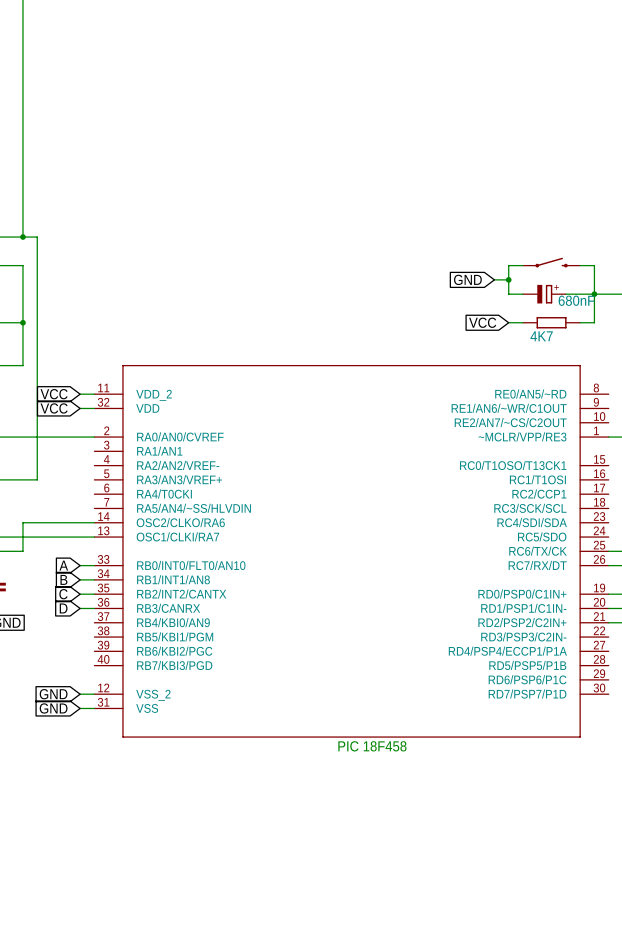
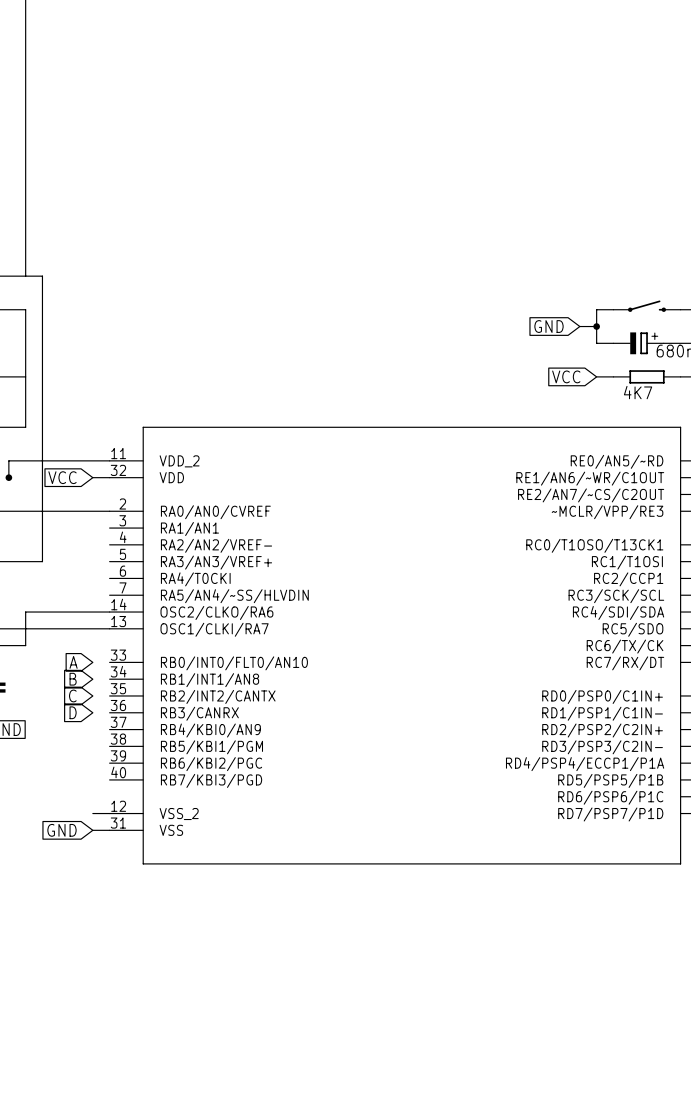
junction: (22, 237) -> none
junction: (22, 322) -> none
global label: VCC (54, 394) -> none
wire: none -> (92, 460) (8, 460) (8, 477)
junction: none -> (8, 477)
wire: (80, 565) (94, 565) -> none
wire: (80, 579) (94, 579) -> none
wire: (80, 594) (94, 594) -> none
wire: (80, 608) (94, 608) -> none
global label: GND (53, 694) -> none
text: PIC 18F458 (372, 746) -> none

